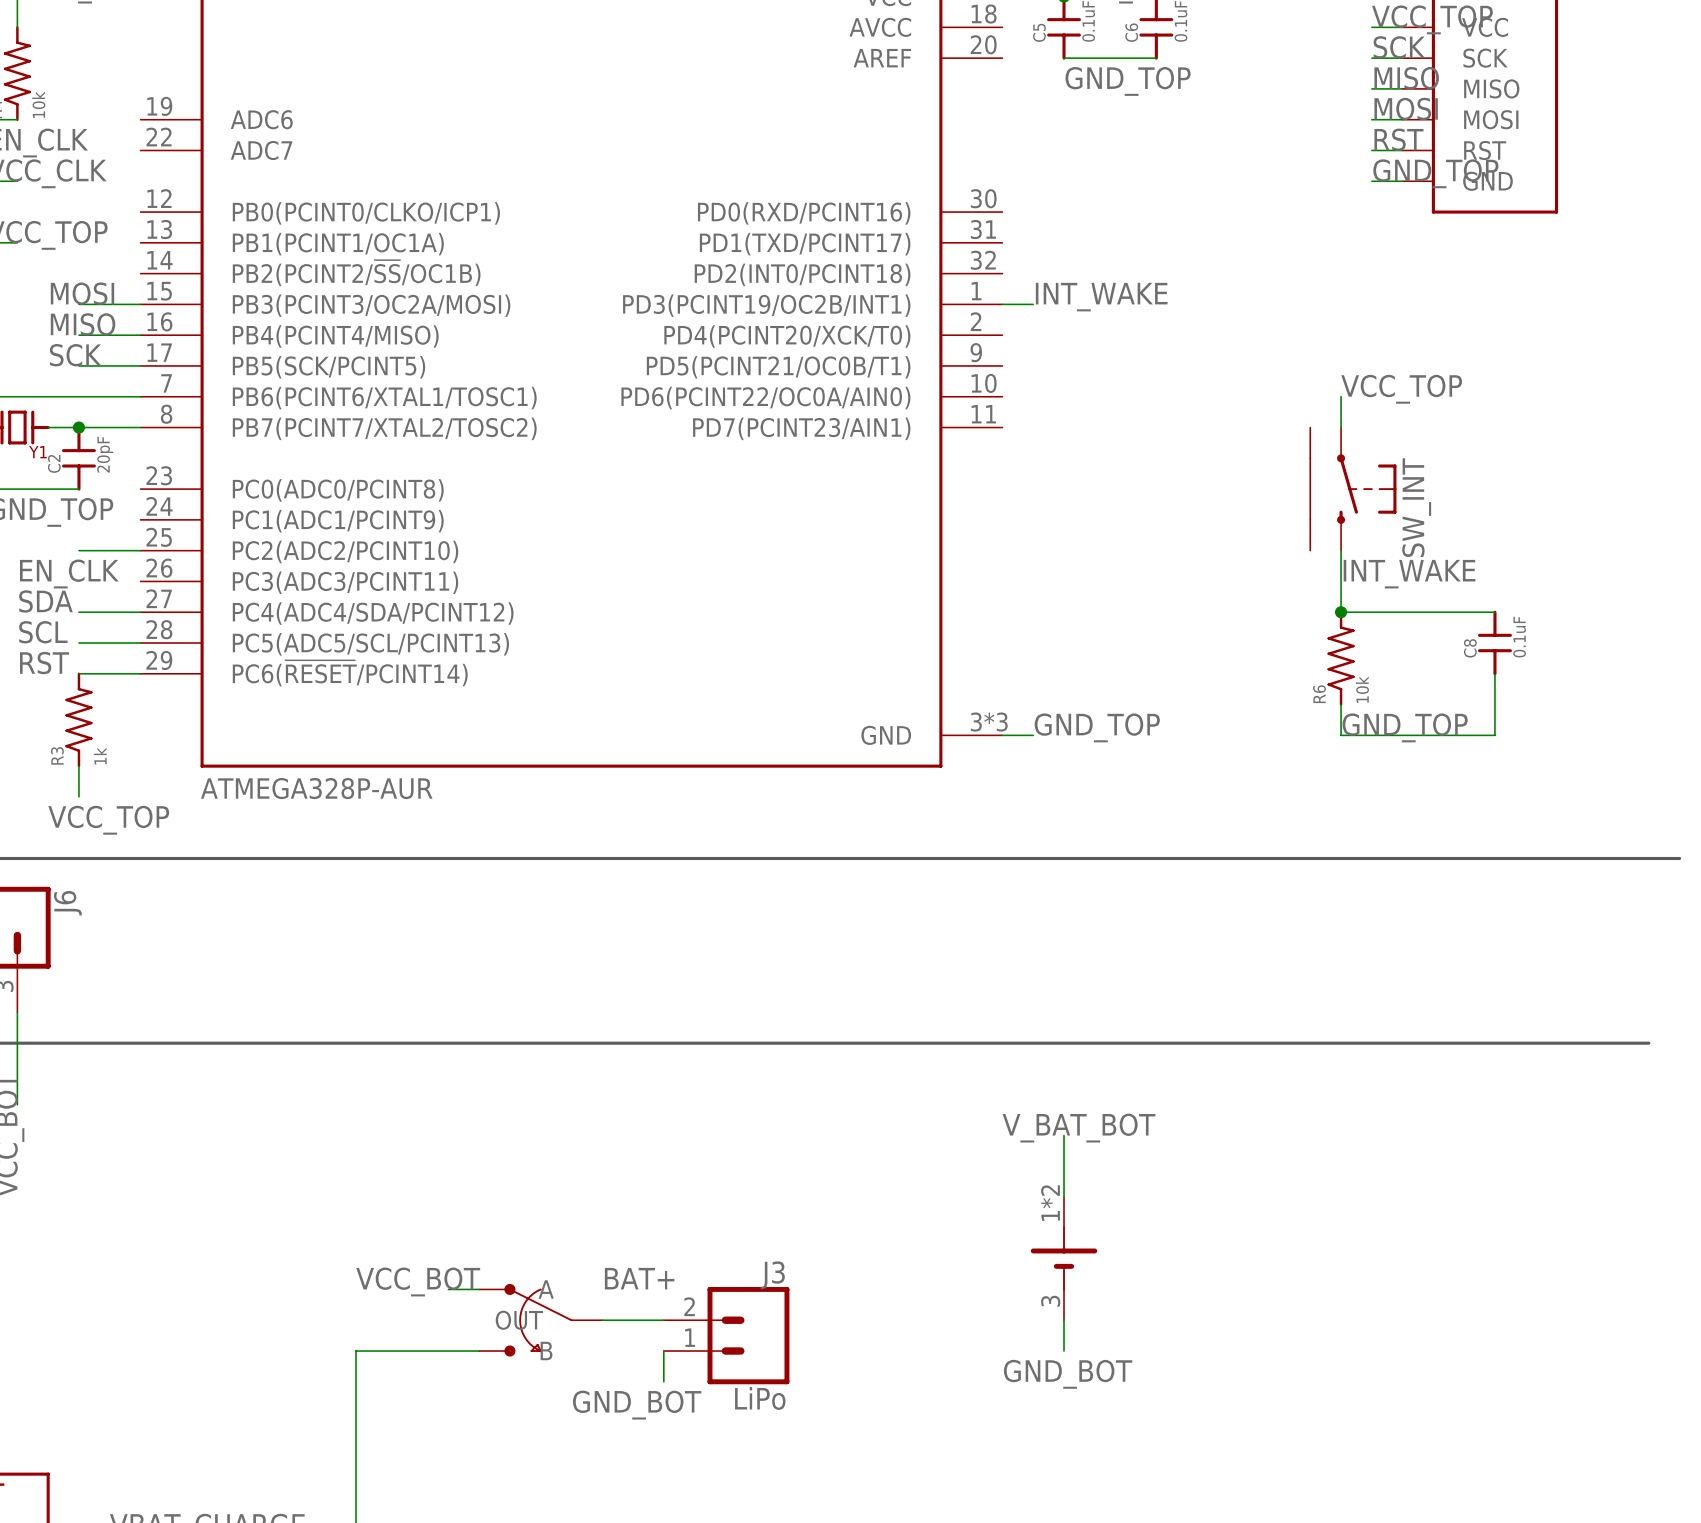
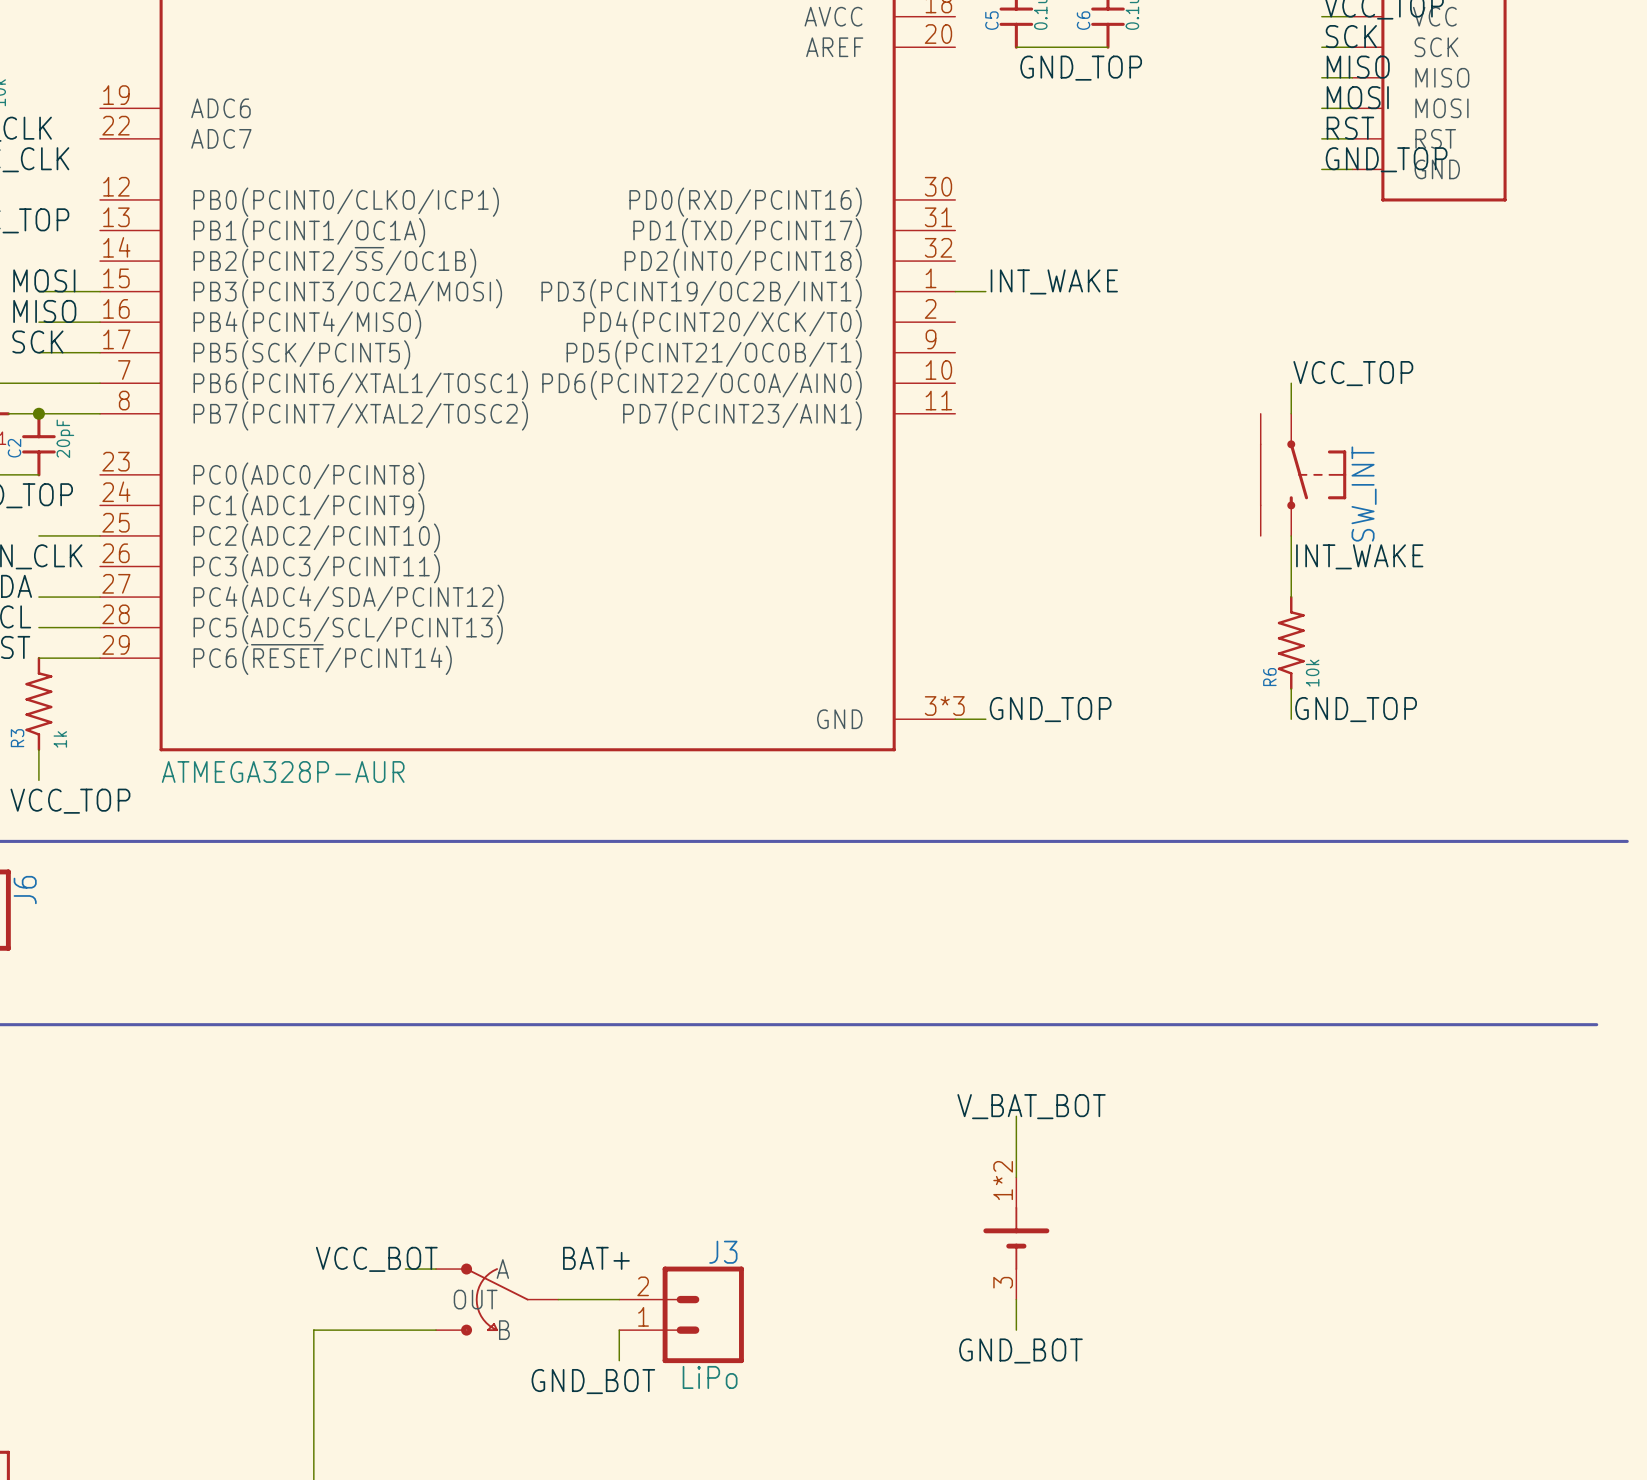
wire: (1341, 612) (1494, 612) -> none
junction: (1341, 612) -> none
C8: 0.1uF (1494, 643) -> none
wire: (1494, 673) (1494, 735) (1341, 735) -> none

